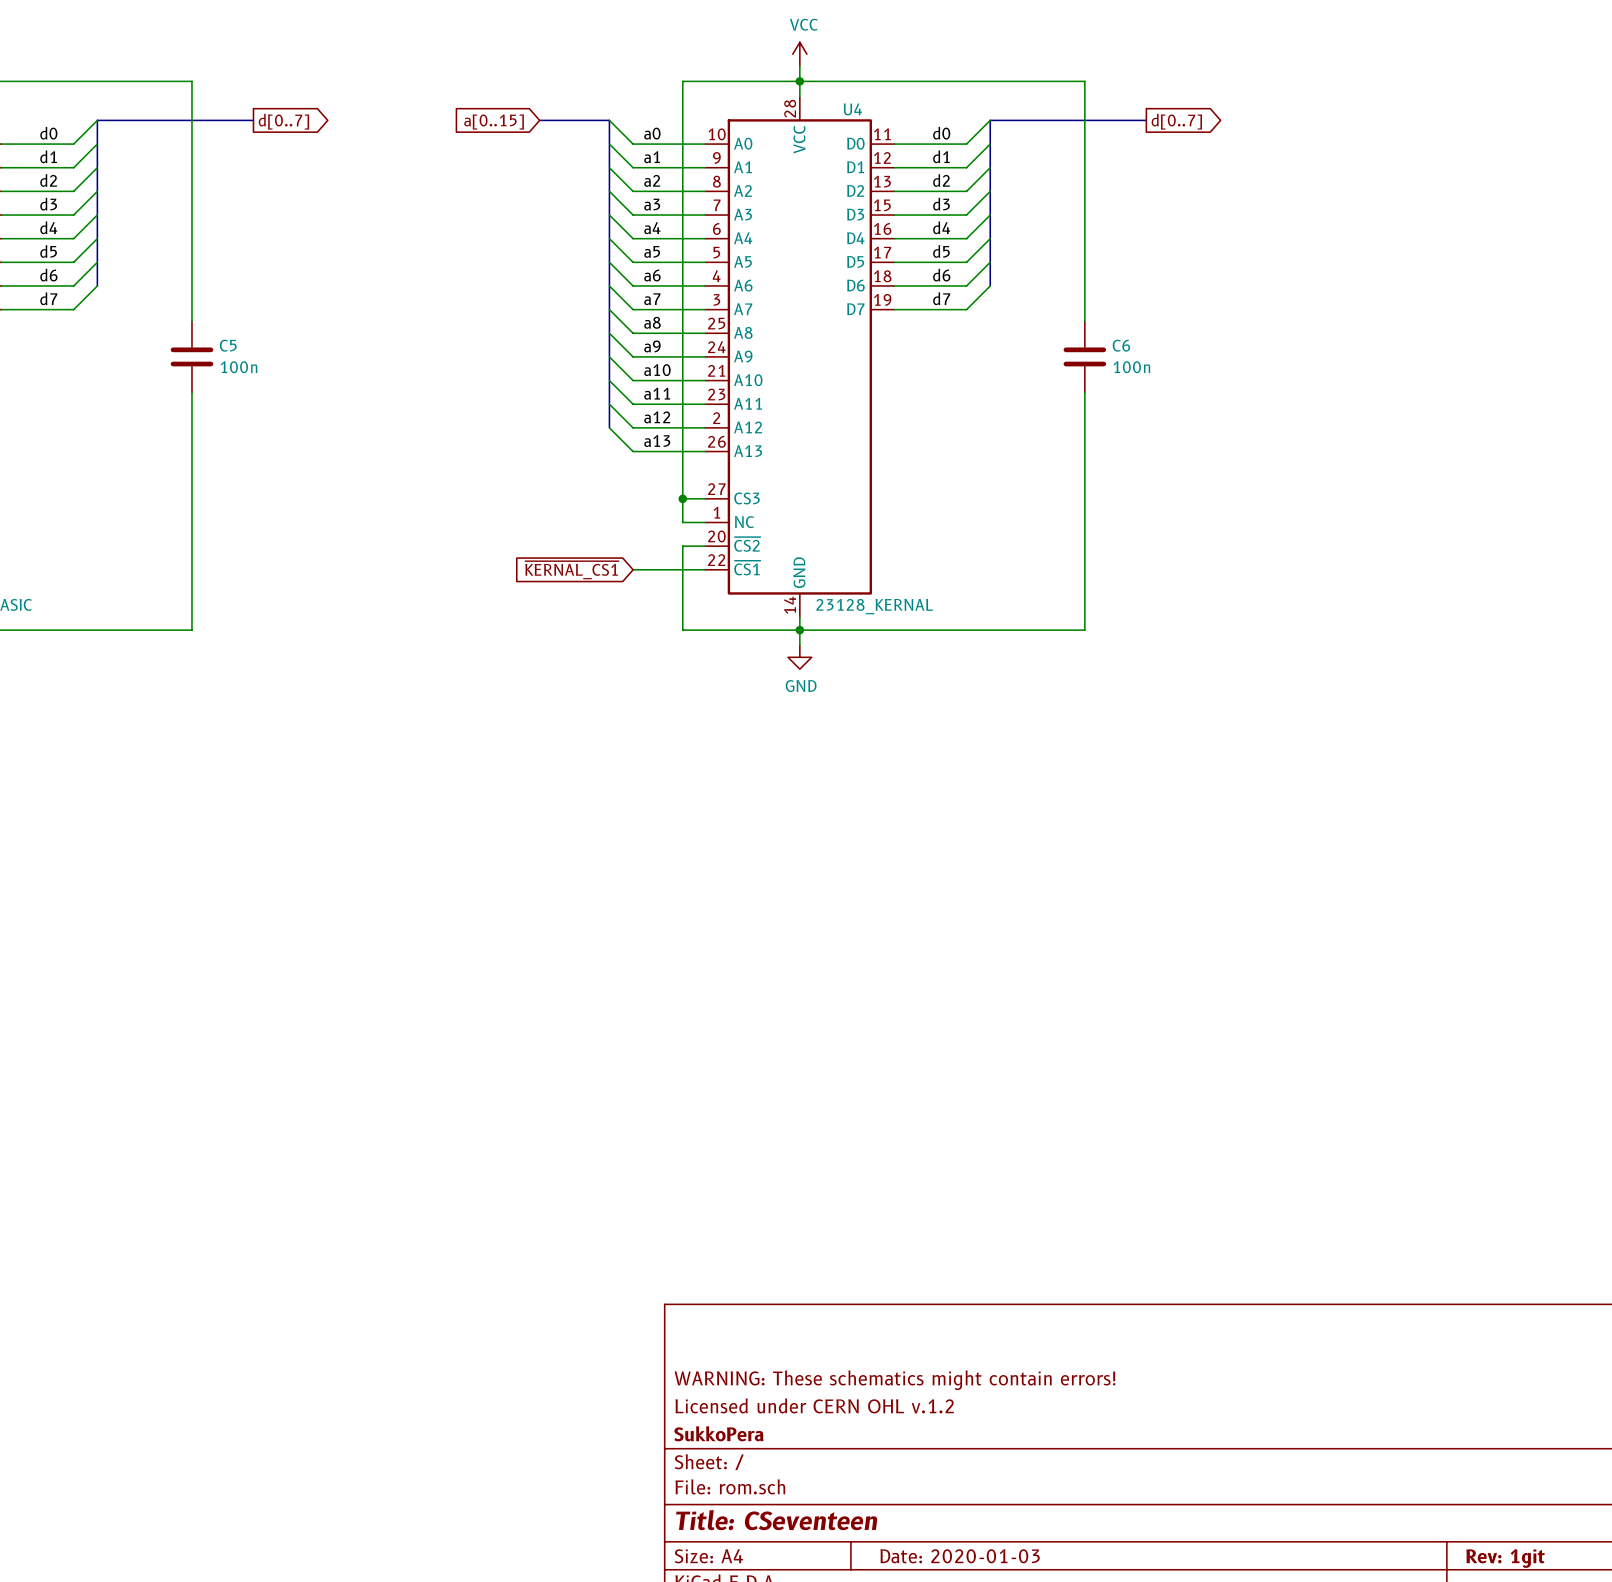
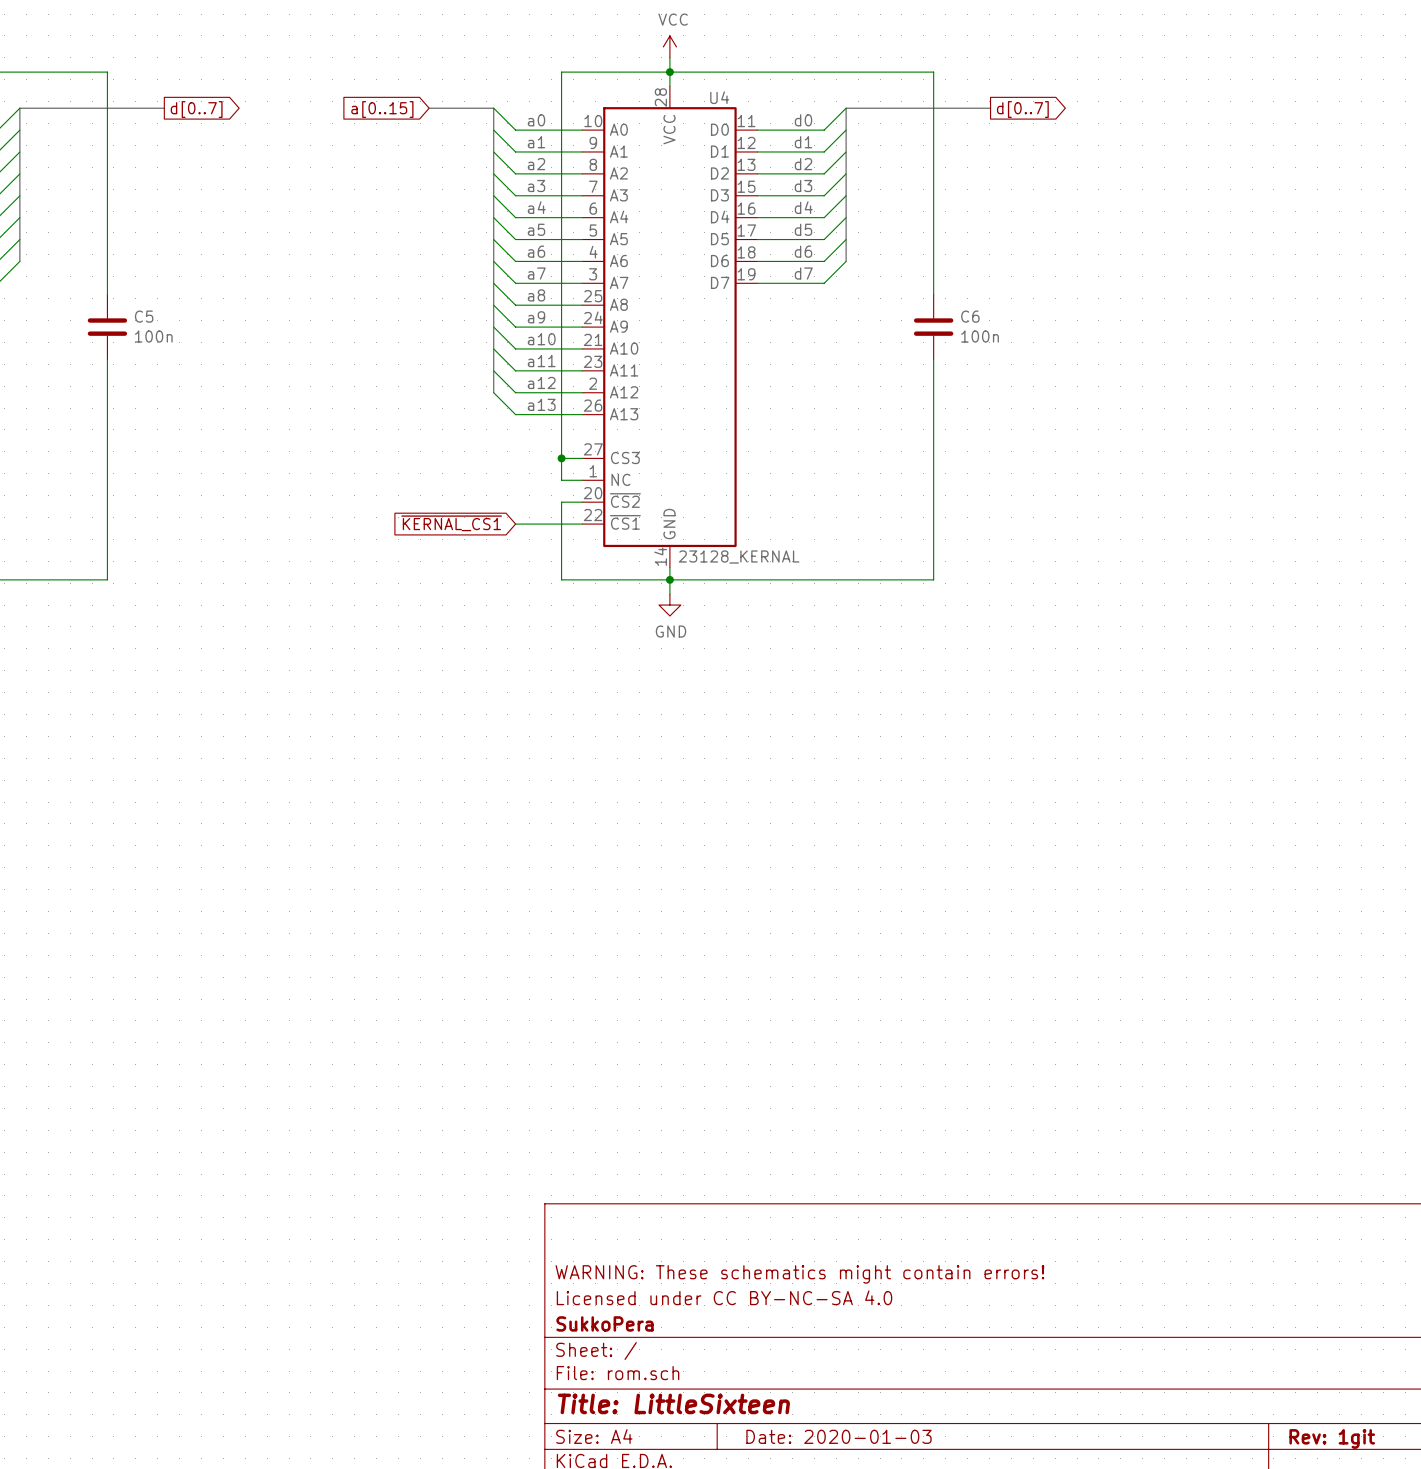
title block: Licensed under CERN OHL v.1.2 (814, 1405) -> Licensed under CC BY-NC-SA 4.0 (724, 1297)
title block: Title: CSeventeen (776, 1520) -> Title: LittleSixteen (673, 1403)

